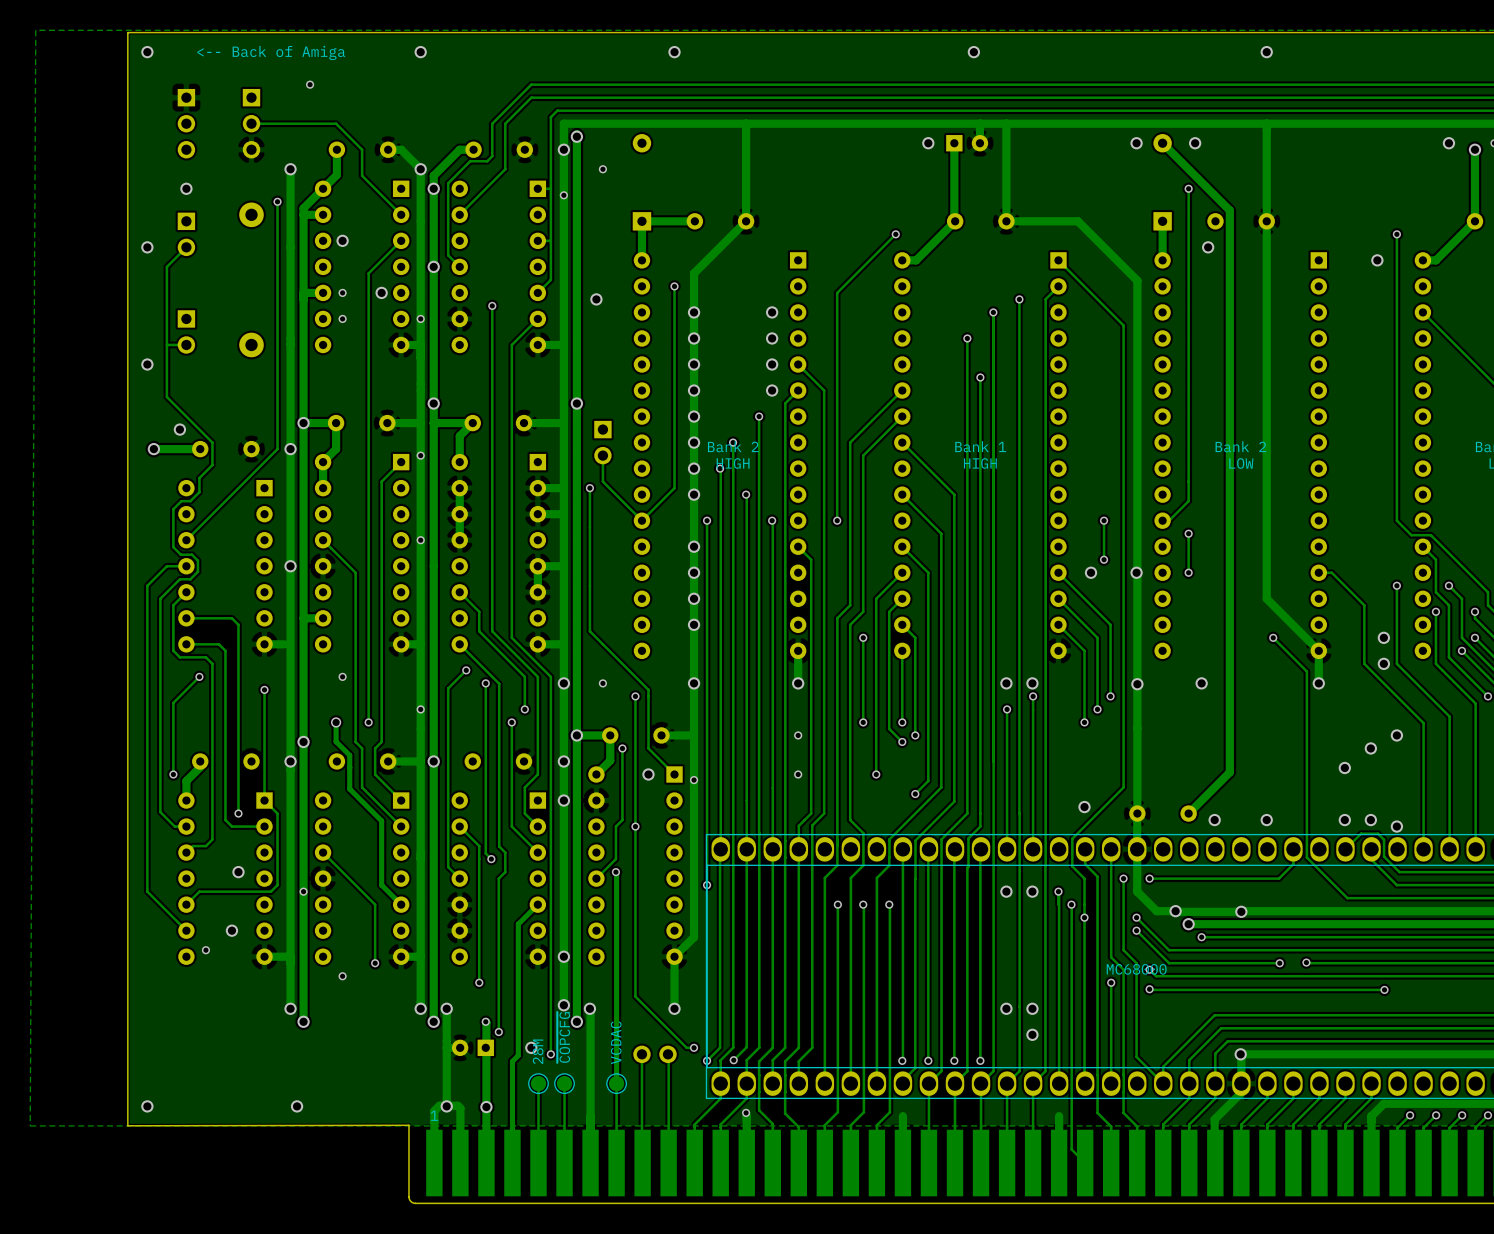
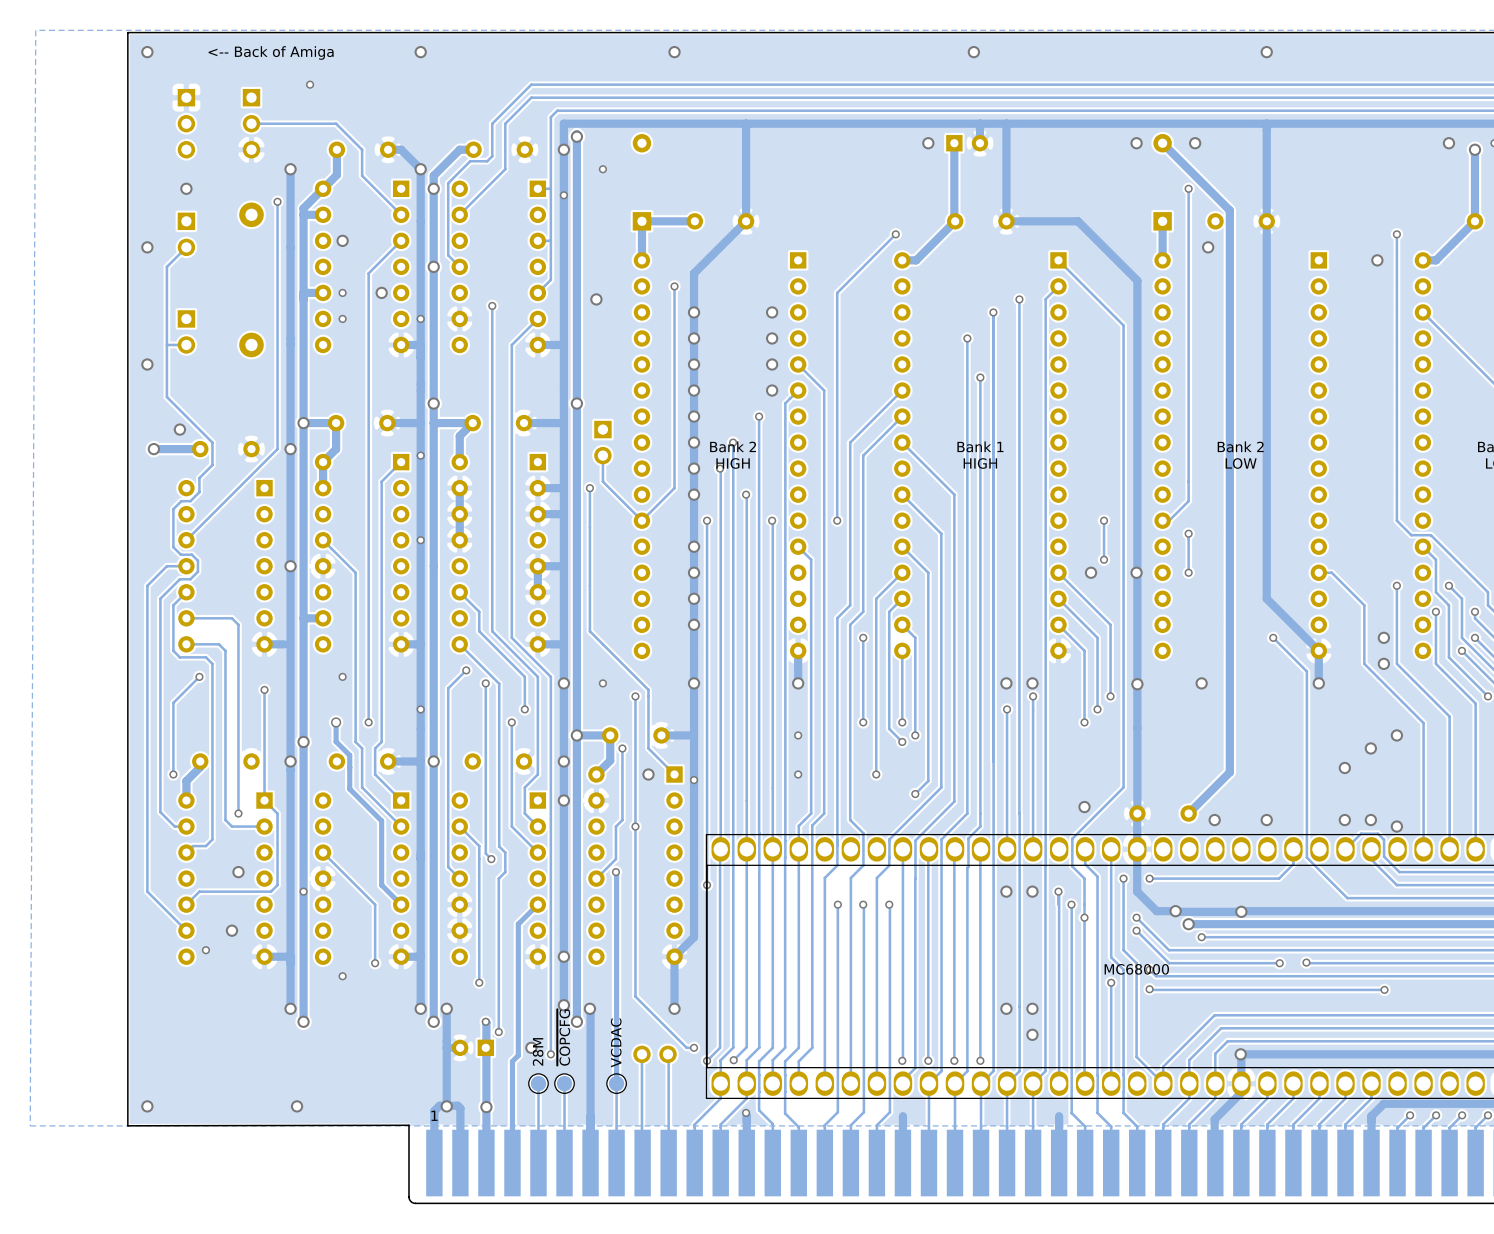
track: (1071, 1113) (1071, 1149) (1085, 1163) -> (1071, 1113) (1085, 1126) (1085, 1163)

